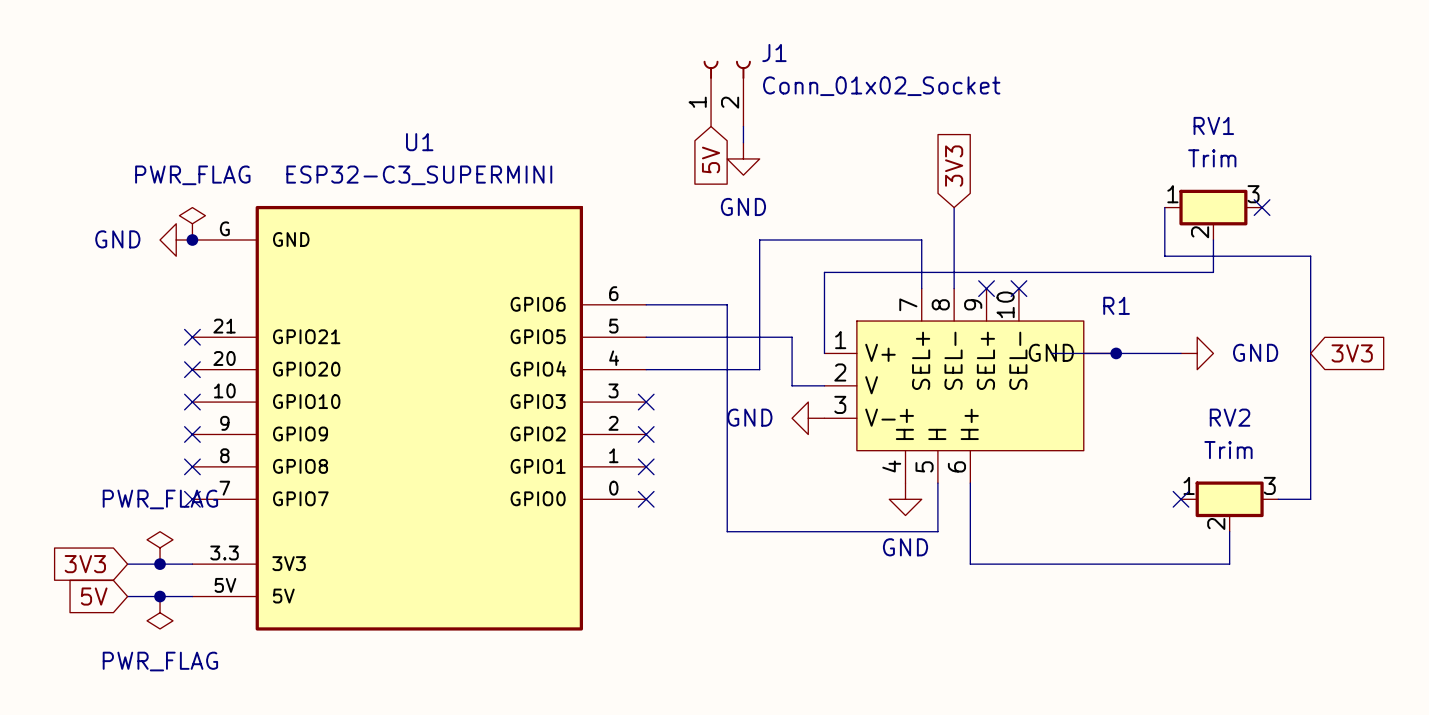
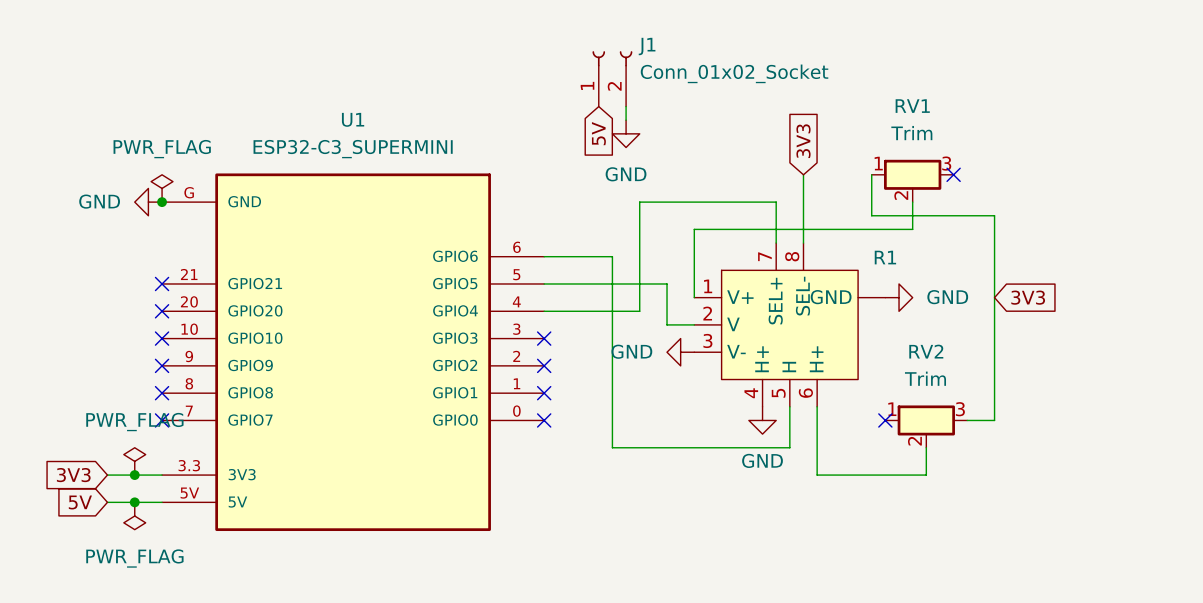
no-connect mark: none -> (953, 174)
wire: (1164, 207) (1164, 256) -> (871, 174) (871, 215) (980, 215)
no-connect mark: (1262, 207) -> none
RV1 position: (1213, 214) -> (912, 180)
wire: (1213, 239) (1213, 272) (1083, 272) -> (912, 202) (912, 229)
wire: (1181, 256) (1310, 256) (1310, 499) (1278, 499) -> (994, 215) (994, 420) (967, 420)
R1 symbol: [824, 288, 1117, 484] -> [694, 243, 886, 407]
no-connect mark: (986, 288) -> none
no-connect mark: (1018, 288) -> none
R1 name position: R1 (1116, 305) -> R1 (885, 257)
wire: (1051, 353) (1181, 353) -> none
junction: (1116, 353) -> none
power symbol position: GND (1197, 353) -> GND (899, 297)
global label position: 3V3 (1352, 353) -> 3V3 (1028, 297)
no-connect mark: none -> (885, 420)
no-connect mark: (1181, 499) -> none
RV2 position: (1229, 506) -> (926, 426)
wire: (1229, 531) (1229, 564) (1099, 564) -> (926, 447) (926, 475)

